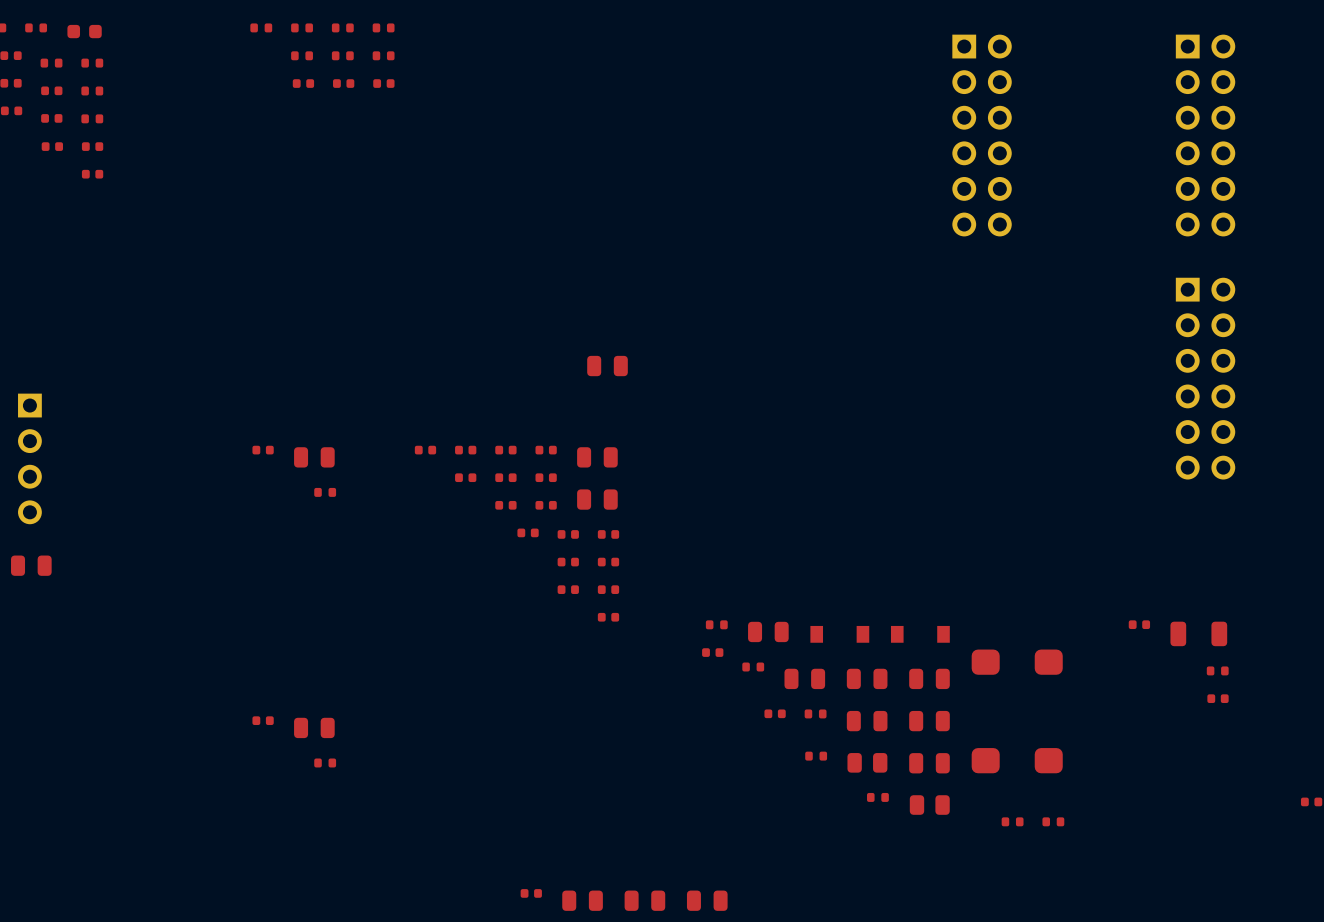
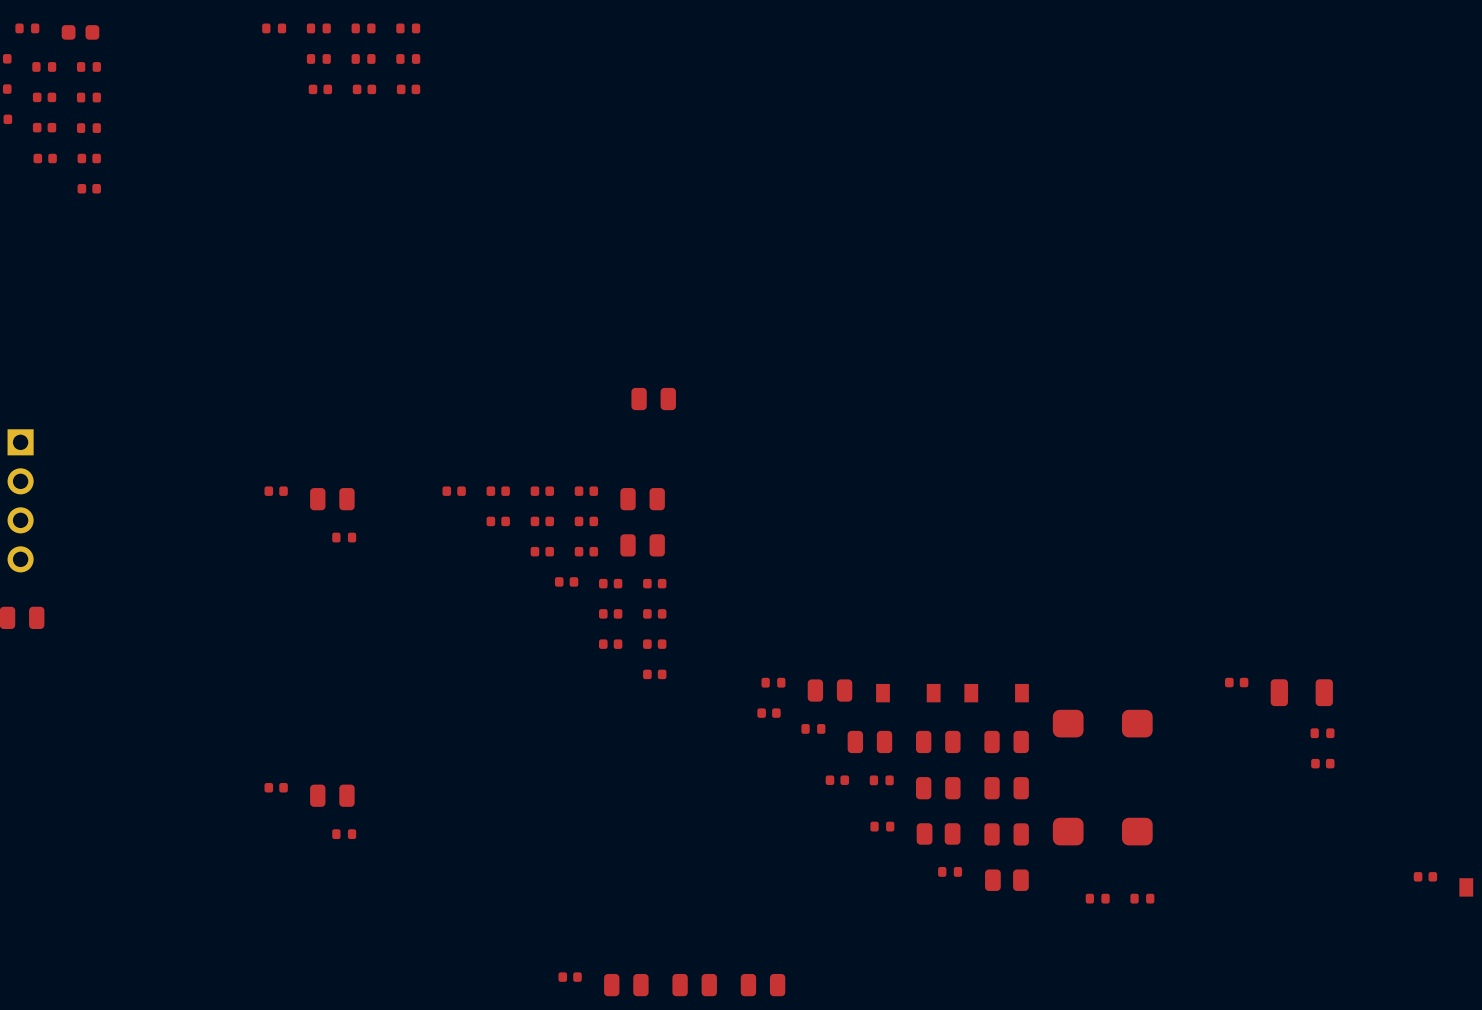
part: (982, 135) -> none
part: (1205, 135) -> none
part: (1205, 378) -> none

